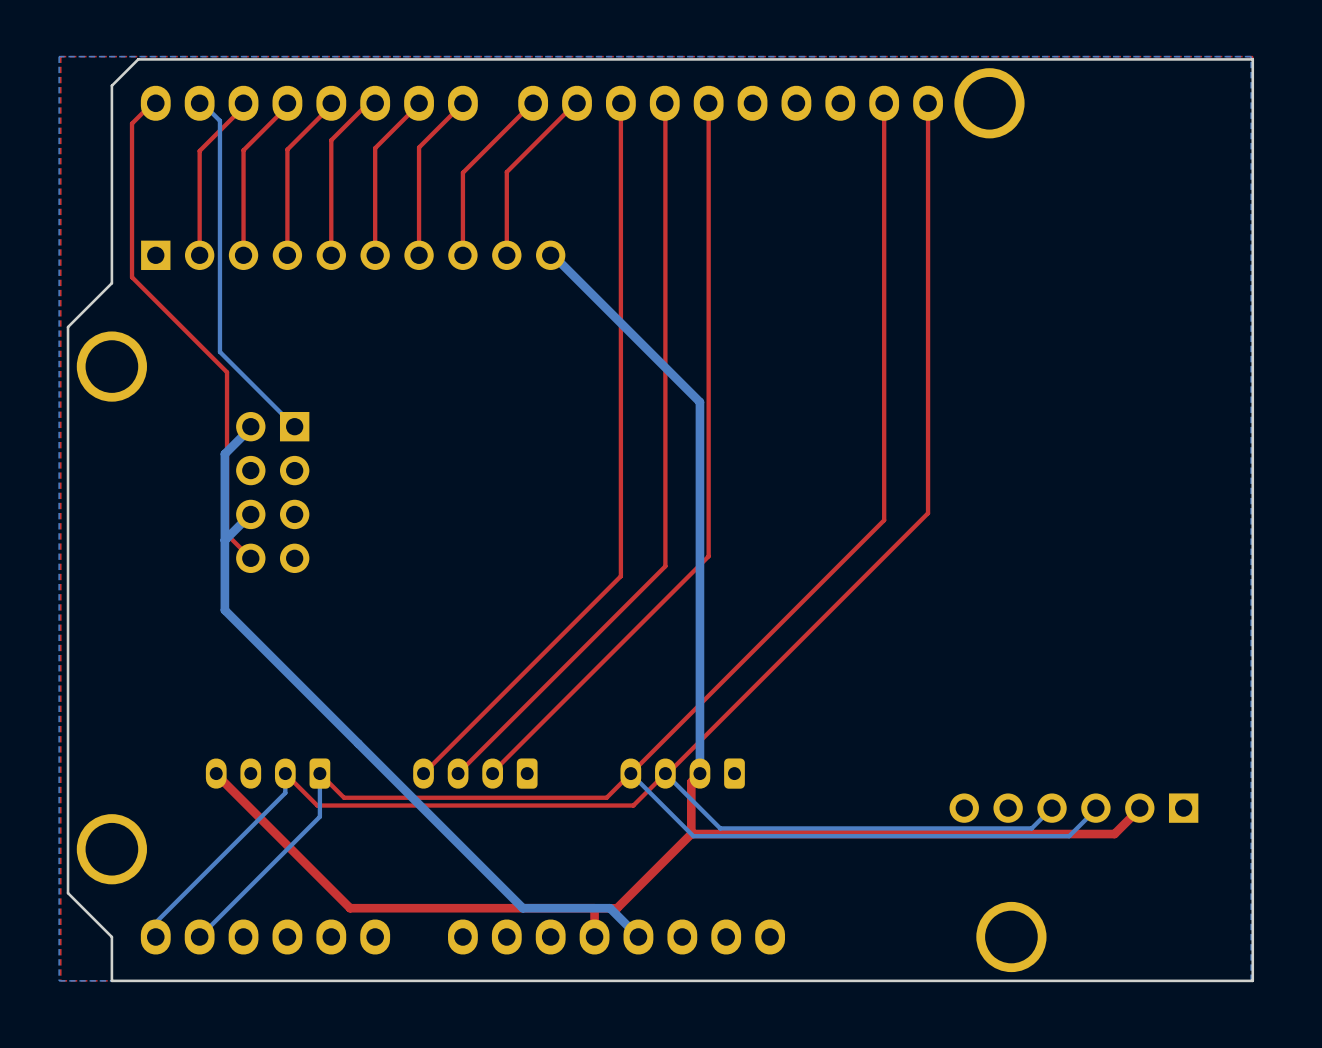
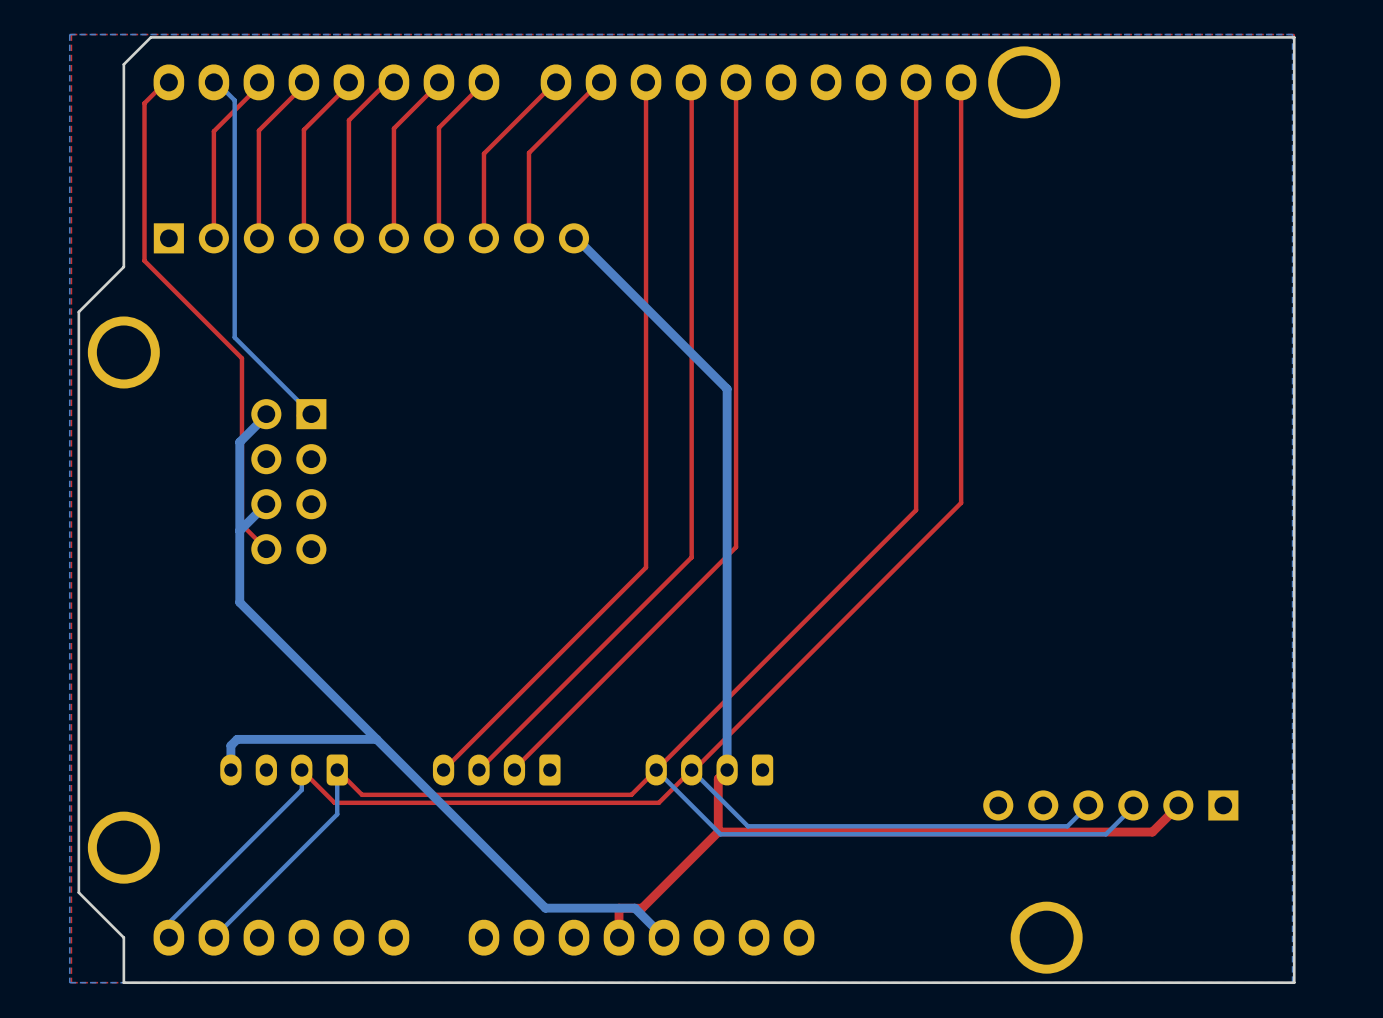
bottom track: none -> (376, 739) (237, 739) (230, 745) (230, 770)
top track: (216, 764) (216, 774) (350, 908) (594, 908) -> none

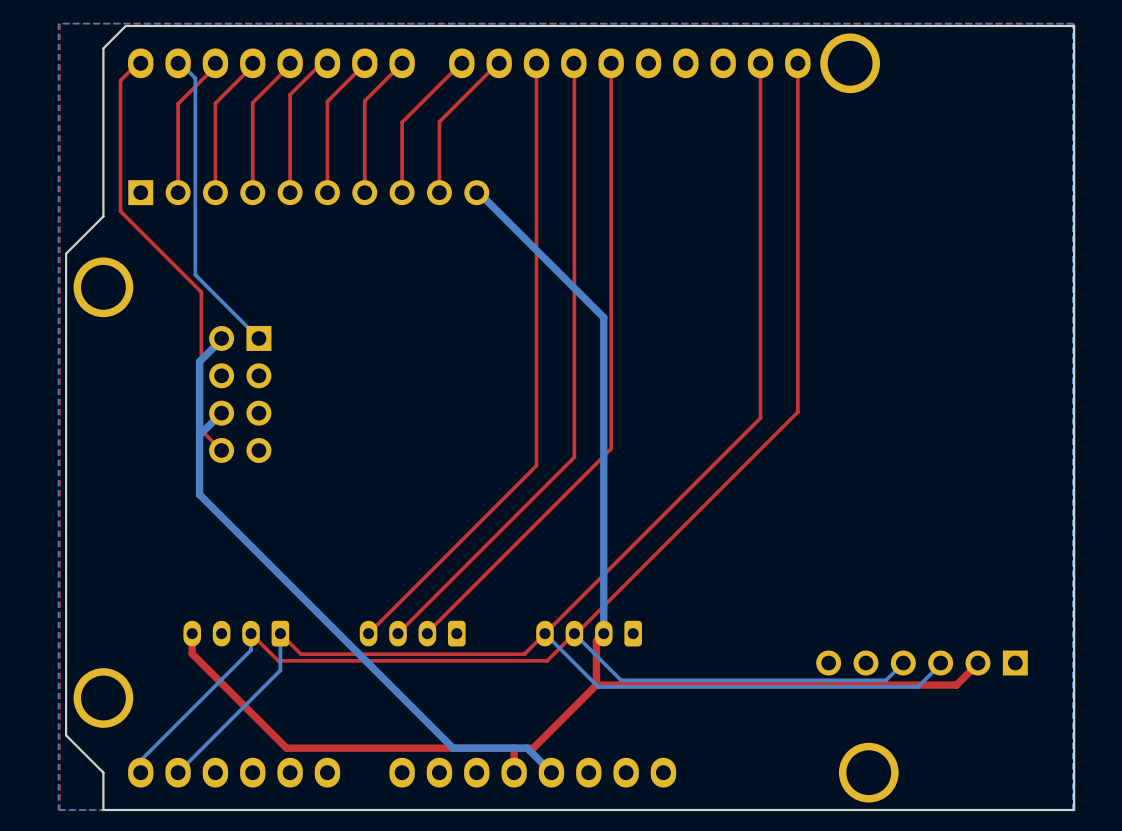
bottom track: (376, 739) (237, 739) (230, 745) (230, 770) -> none
top track: none -> (192, 633) (192, 653) (286, 748) (514, 748)

